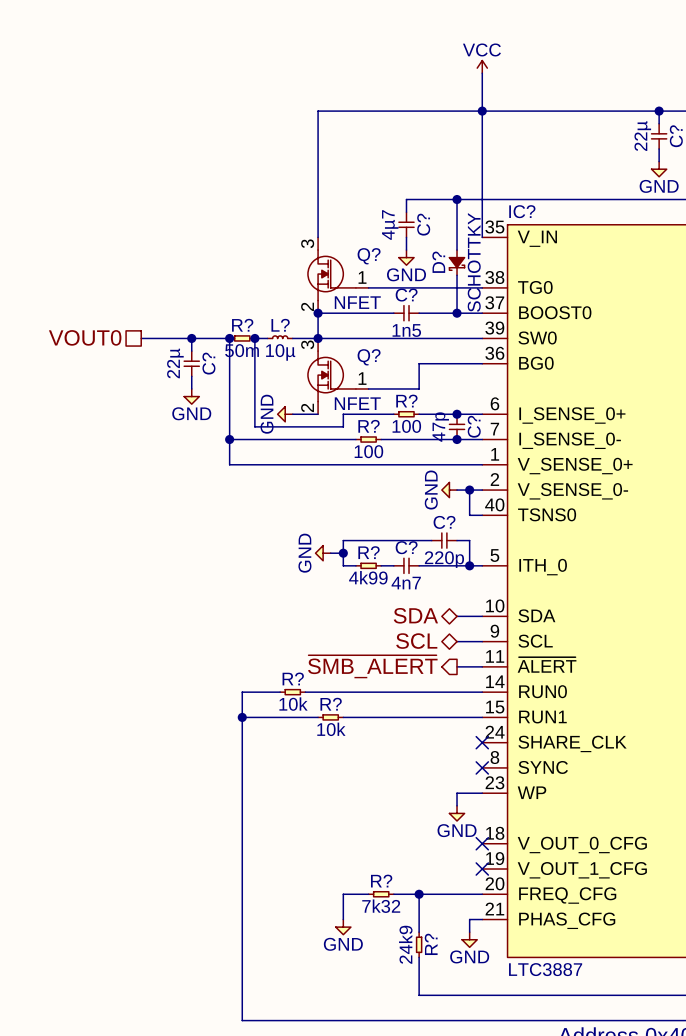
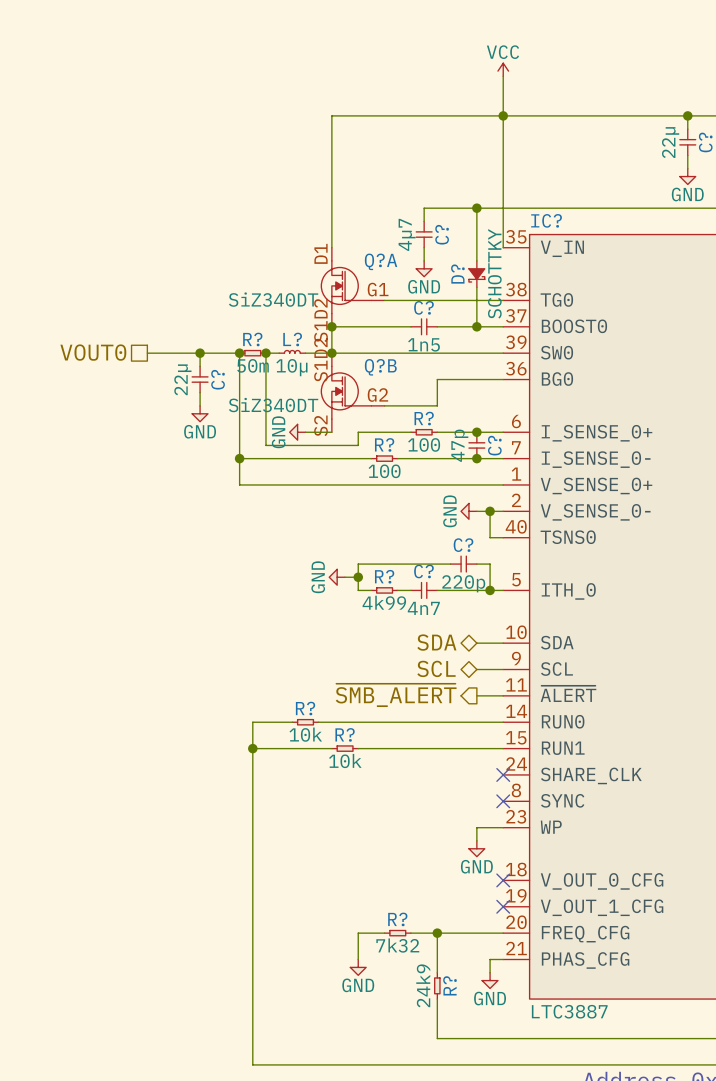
Q? pin number: 3 (307, 243) -> D1 (321, 253)
Q? name: Q? (369, 256) -> Q?A (381, 261)
Q? pin number: 1 (362, 277) -> G1 (378, 289)
Q? value: NFET (357, 302) -> SiZ340DT (273, 299)
Q? pin number: 2 (307, 306) -> S1D2 (321, 320)
Q? pin number: 3 (307, 344) -> S1D2 (321, 359)
Q? name: Q? (369, 357) -> Q?B (380, 367)
Q? pin number: 1 (362, 378) -> G2 (377, 395)
Q? value: NFET (357, 403) -> SiZ340DT (273, 405)
Q? pin number: 2 (307, 407) -> S2 (321, 425)

